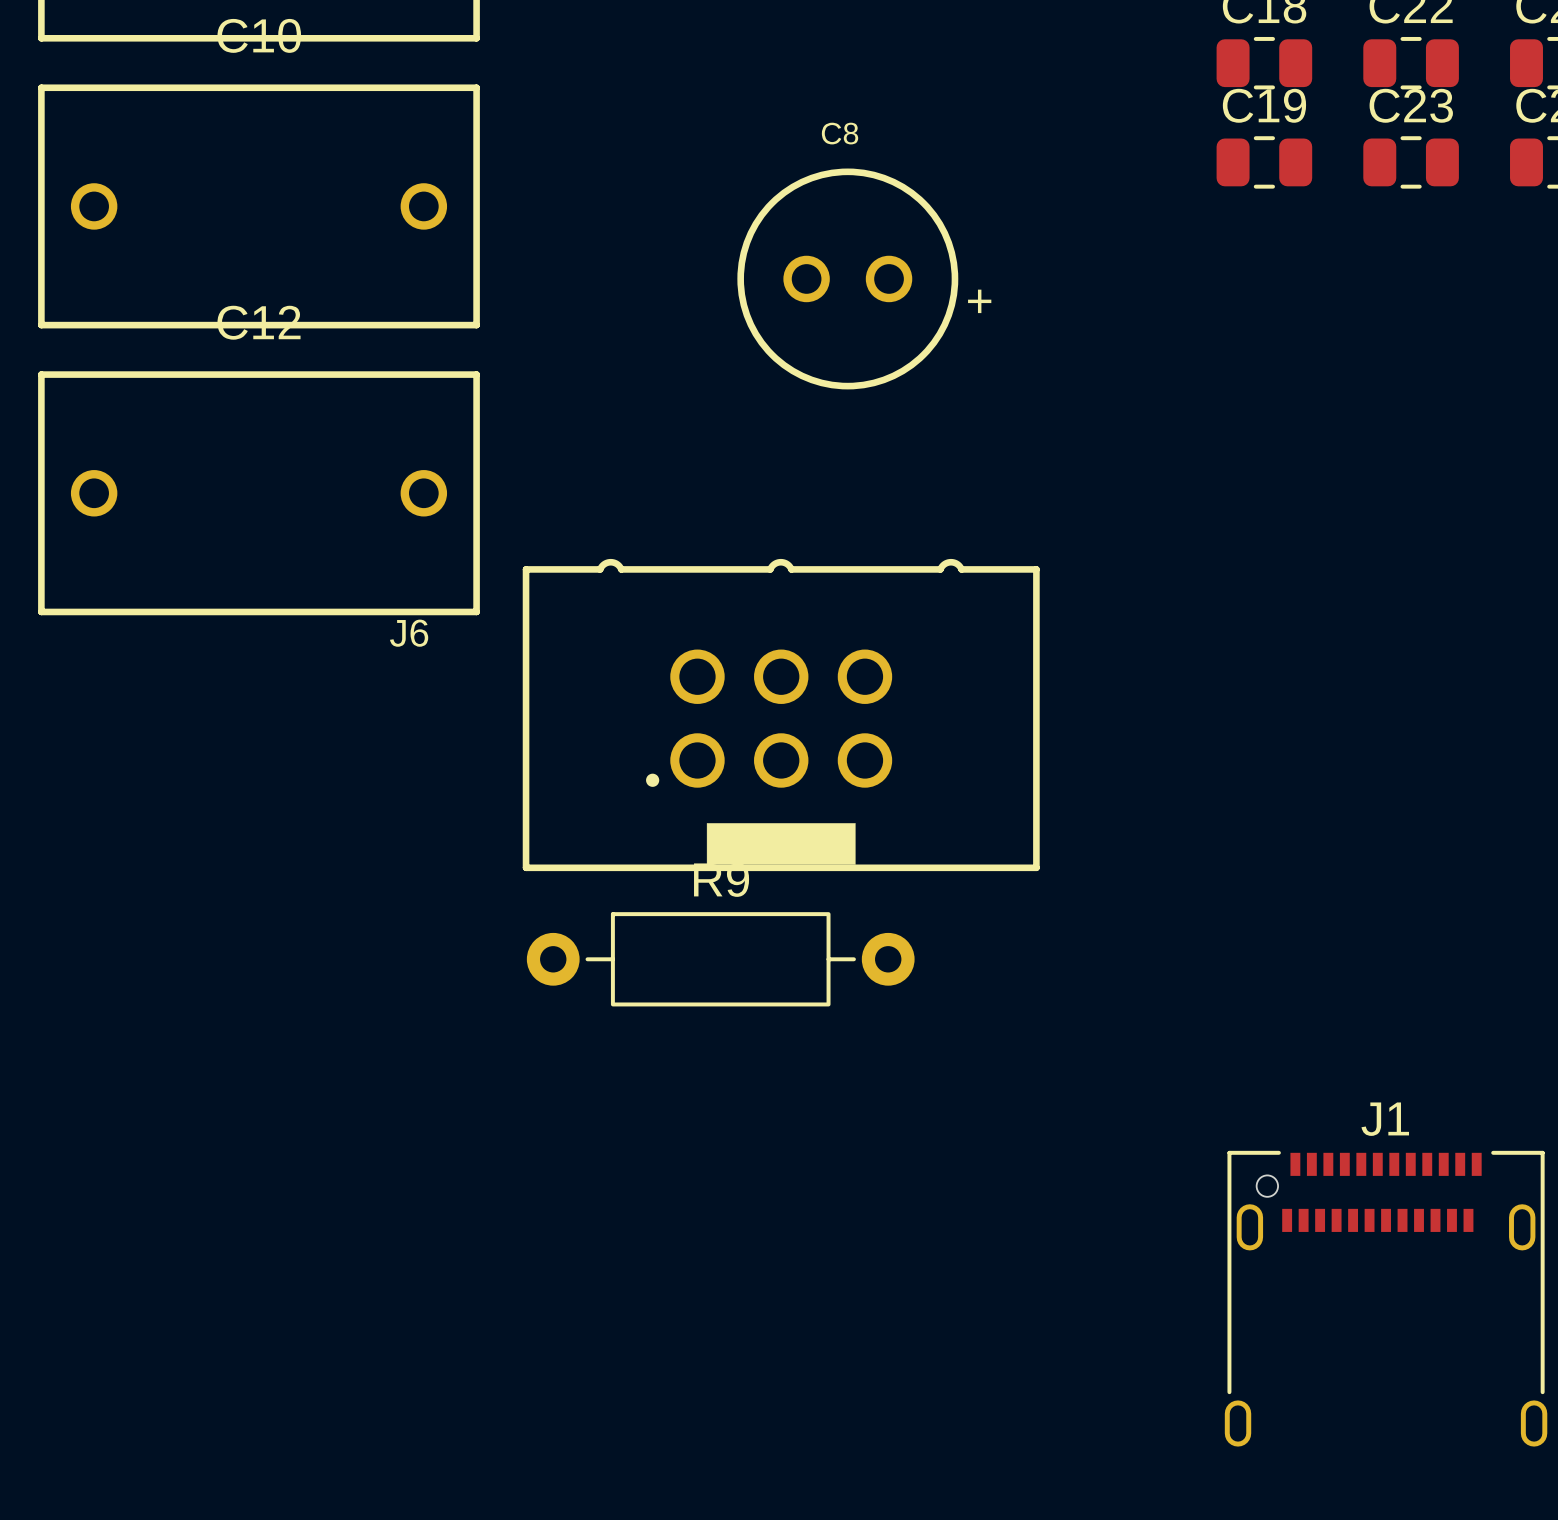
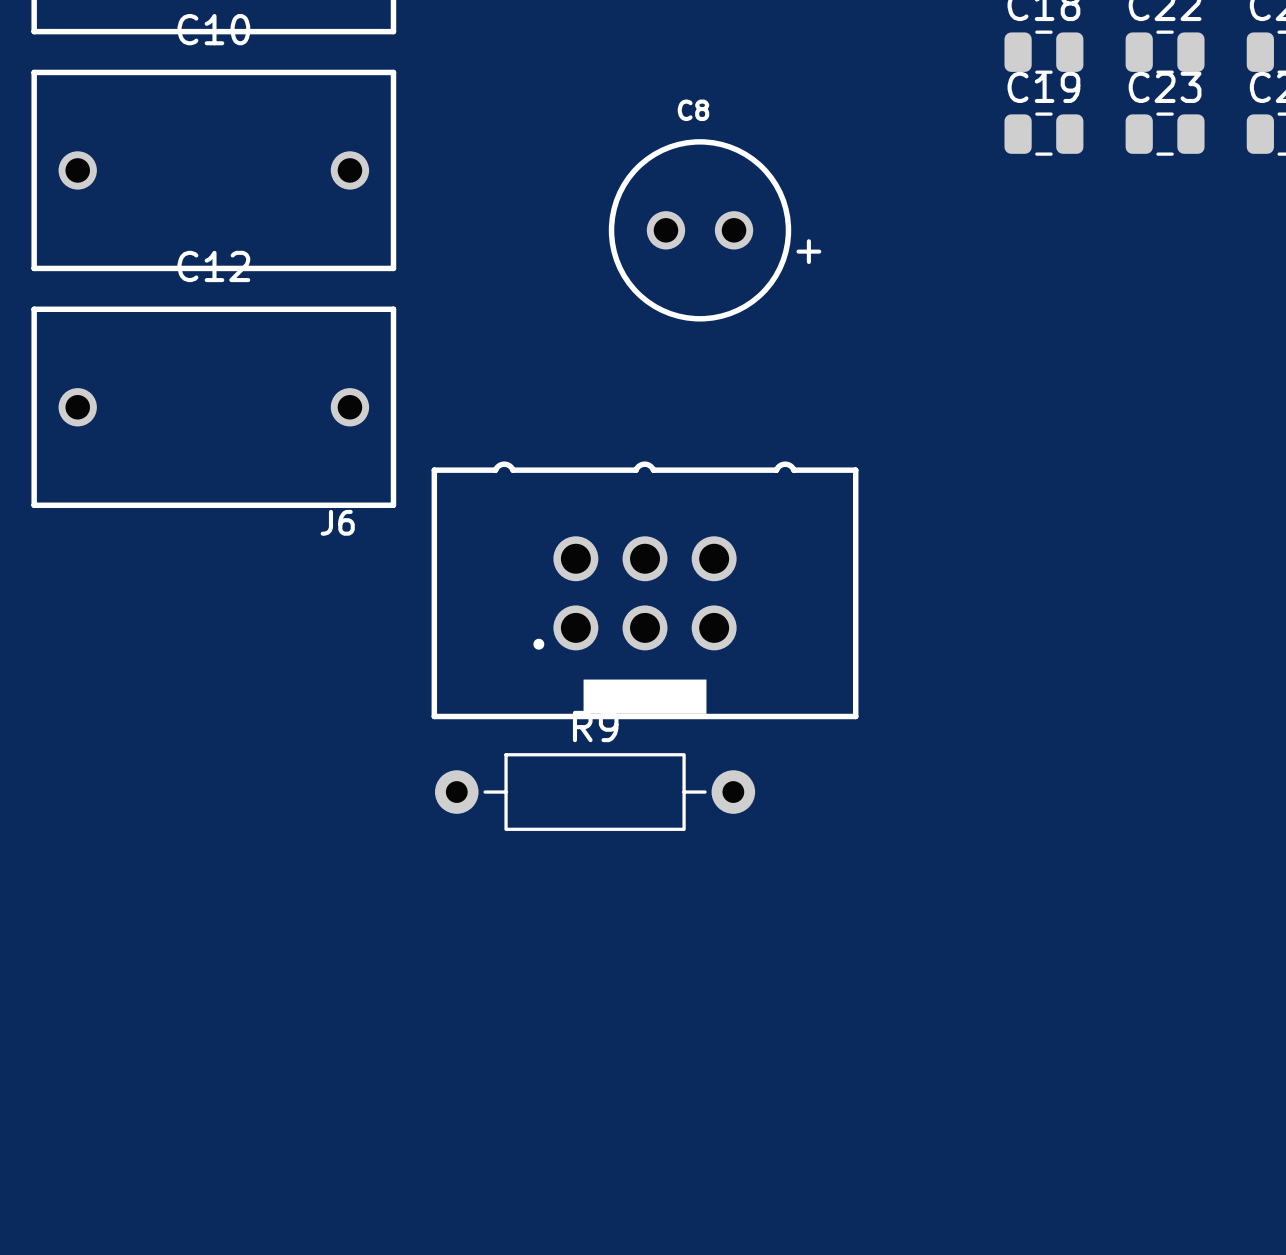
J1: (1386, 1298) -> none

